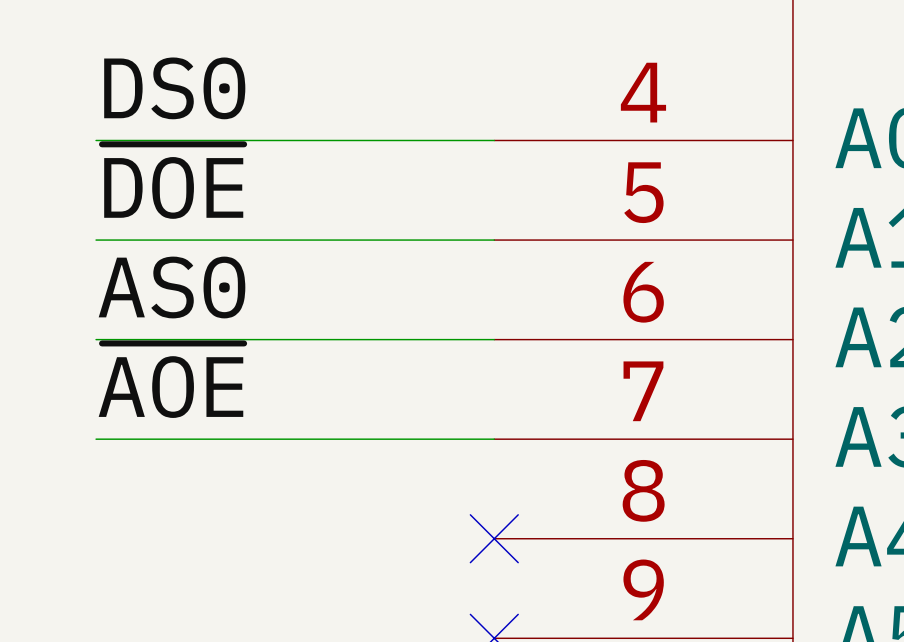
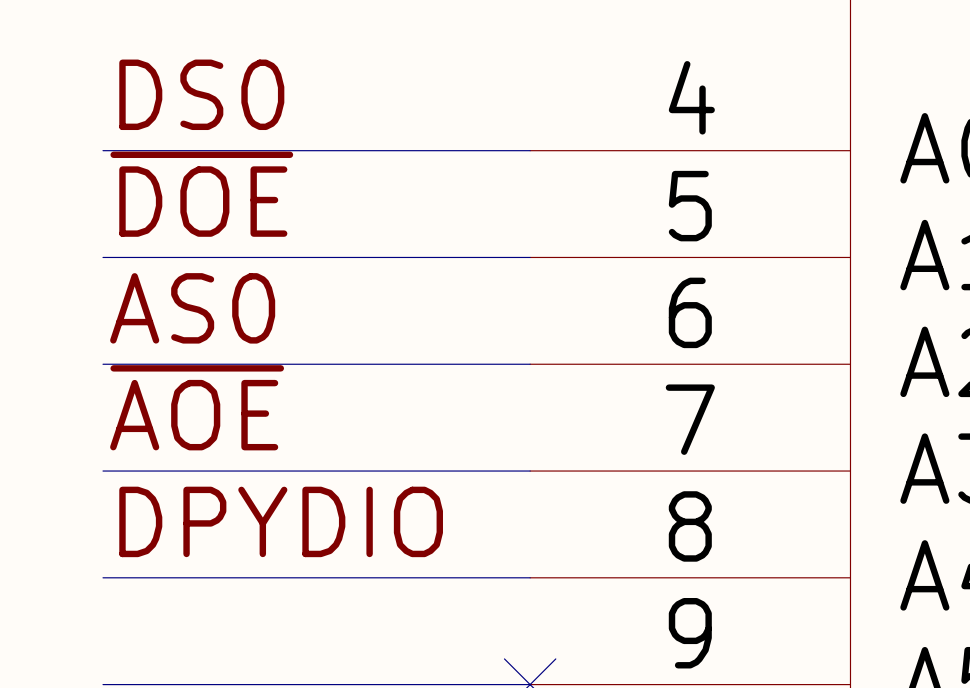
label: none -> DPYDIO (281, 521)
wire: none -> (103, 577) (530, 577)
no-connect mark: (494, 538) -> none
wire: none -> (103, 684) (530, 684)

